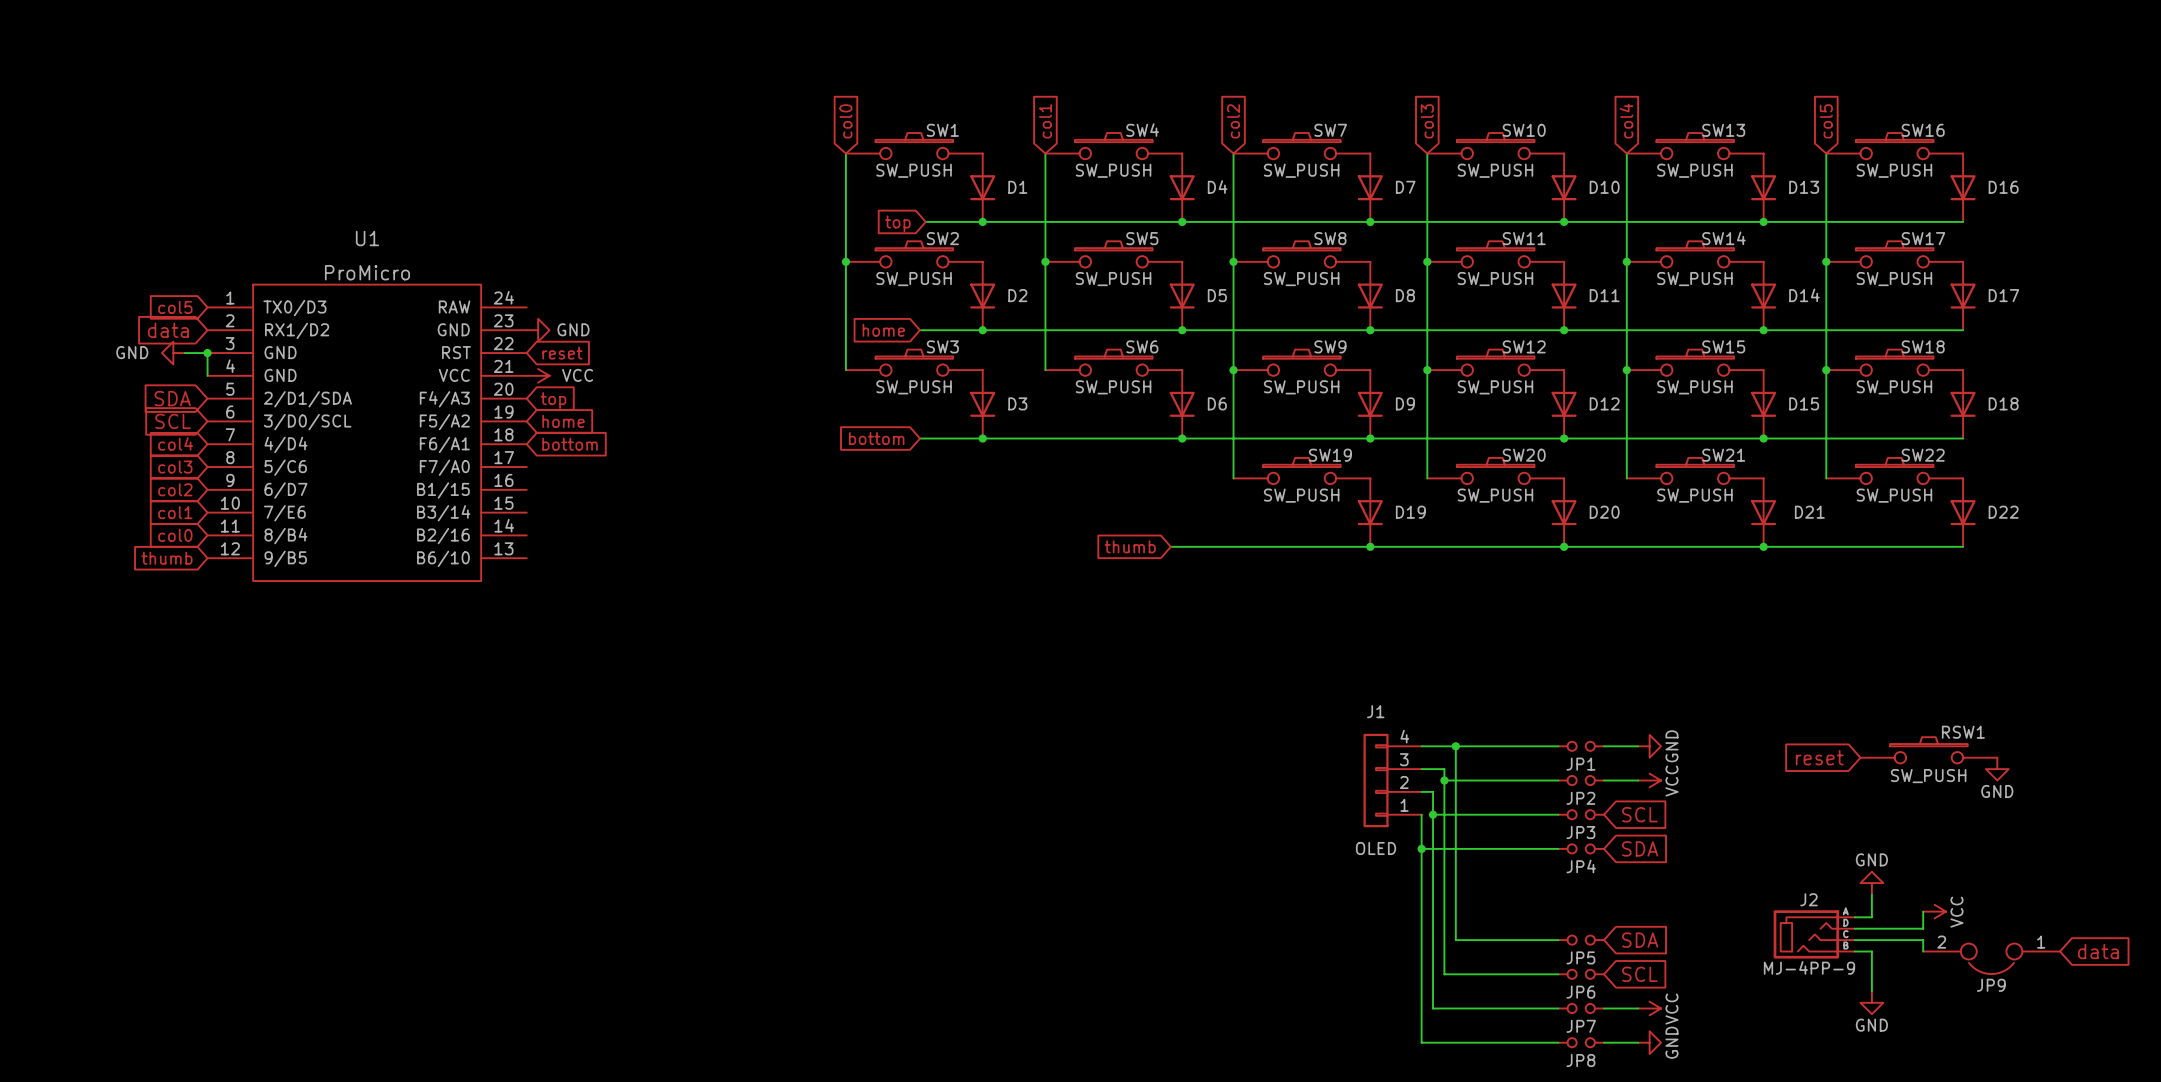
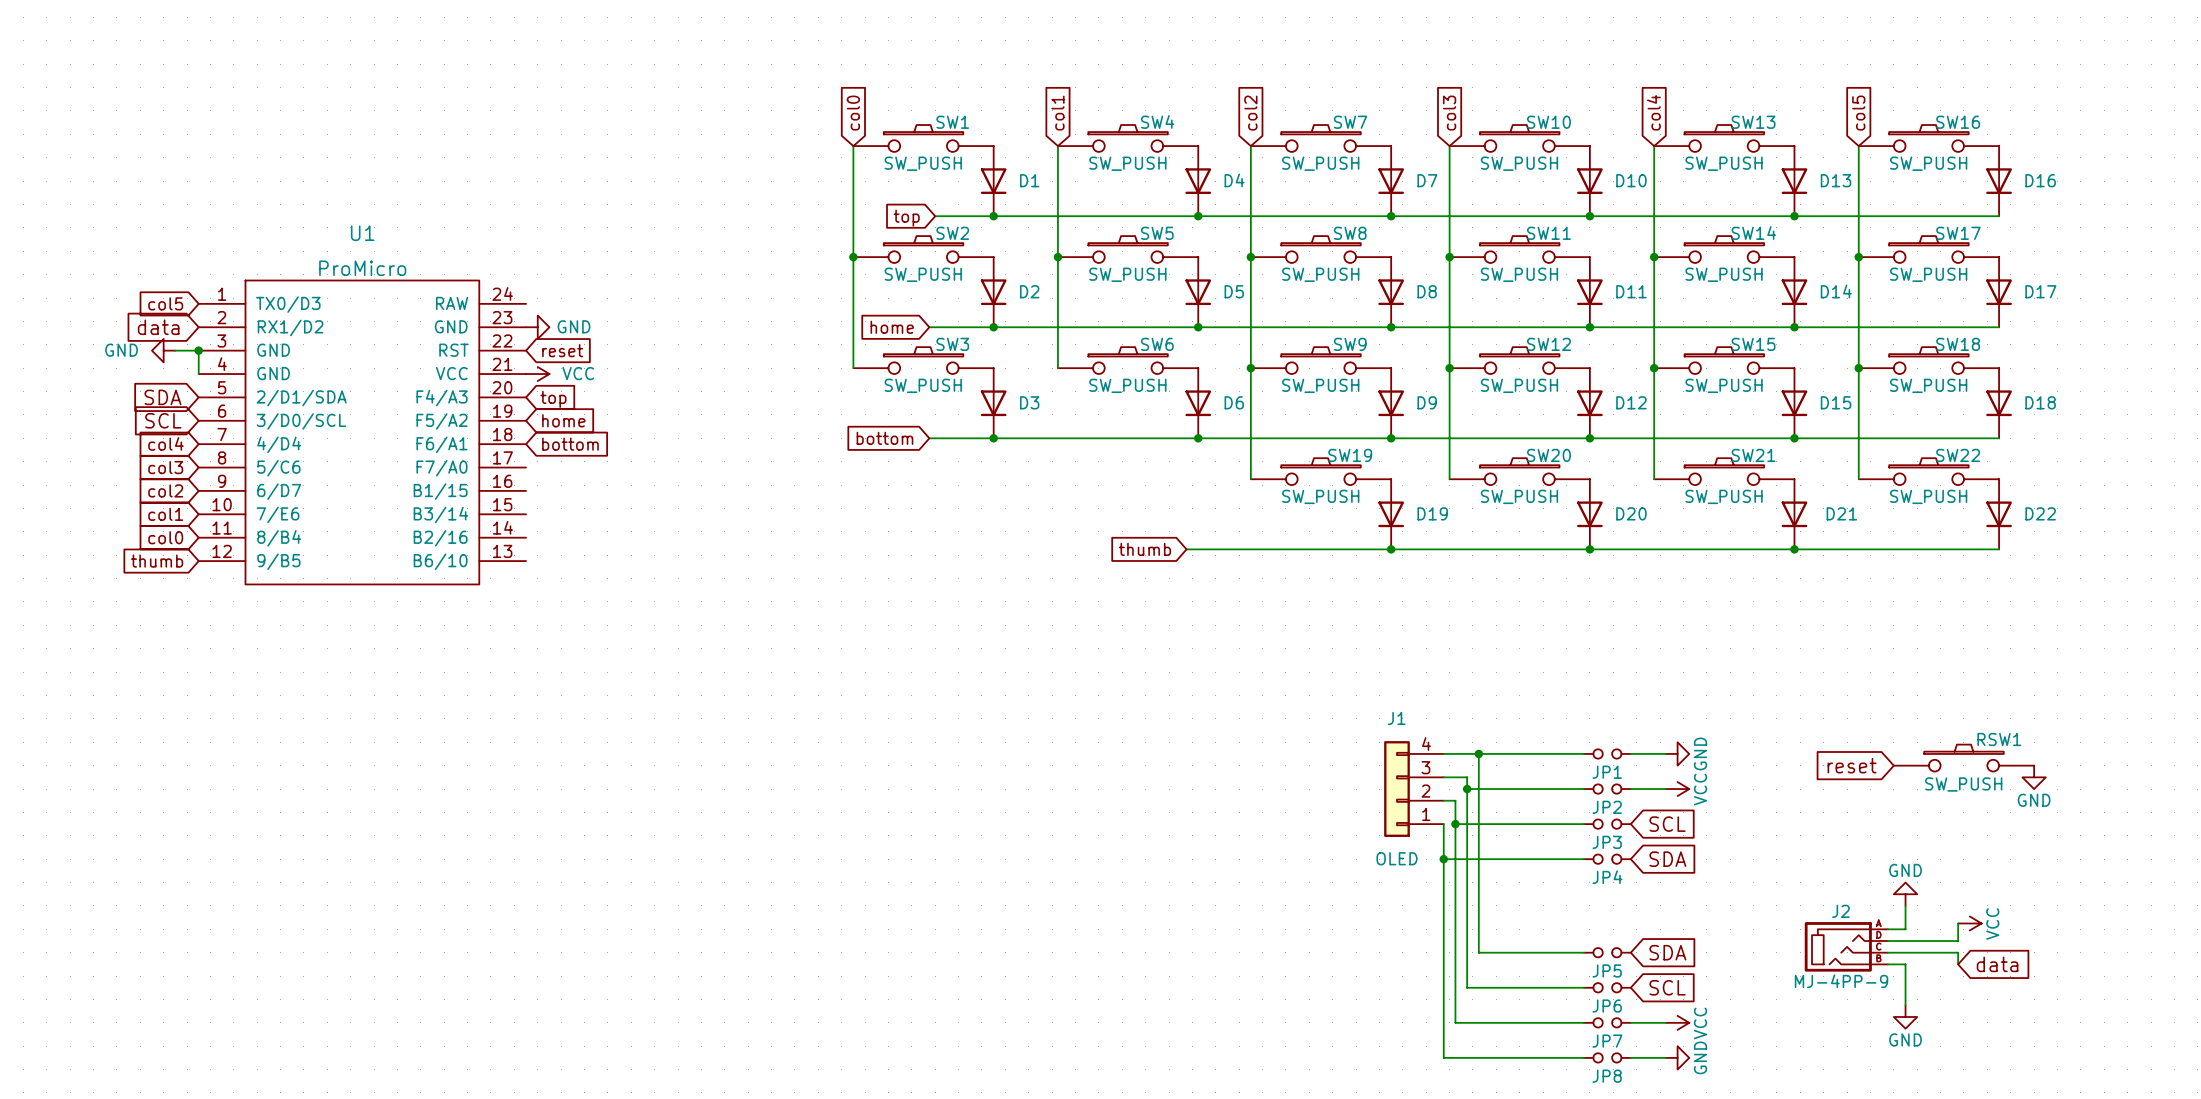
global label position: data (2098, 951) -> data (1997, 964)
JP9: (1991, 958) -> none

